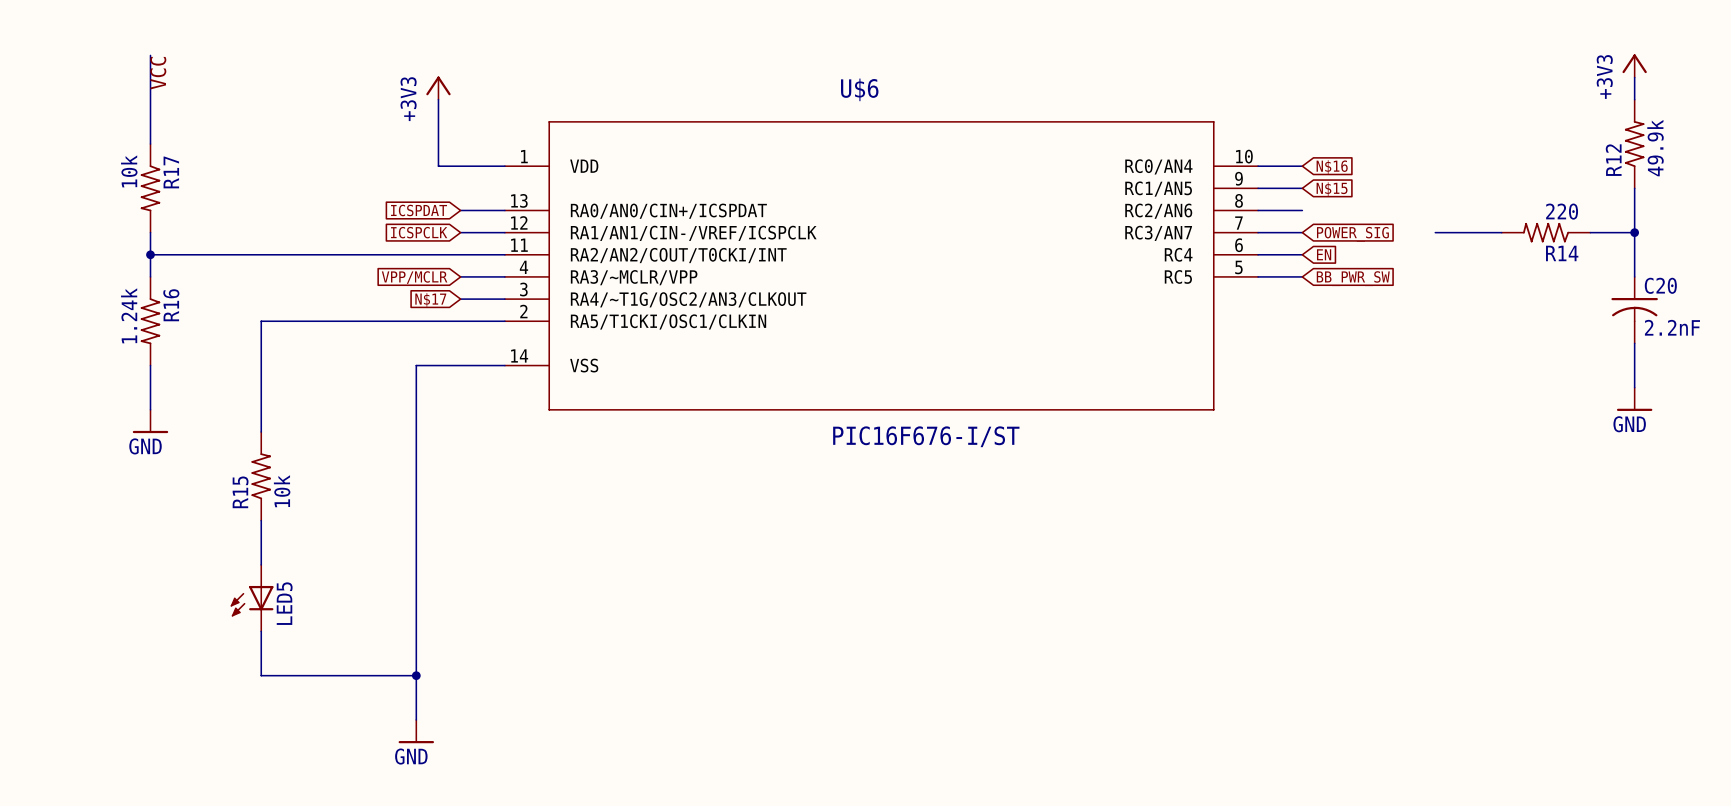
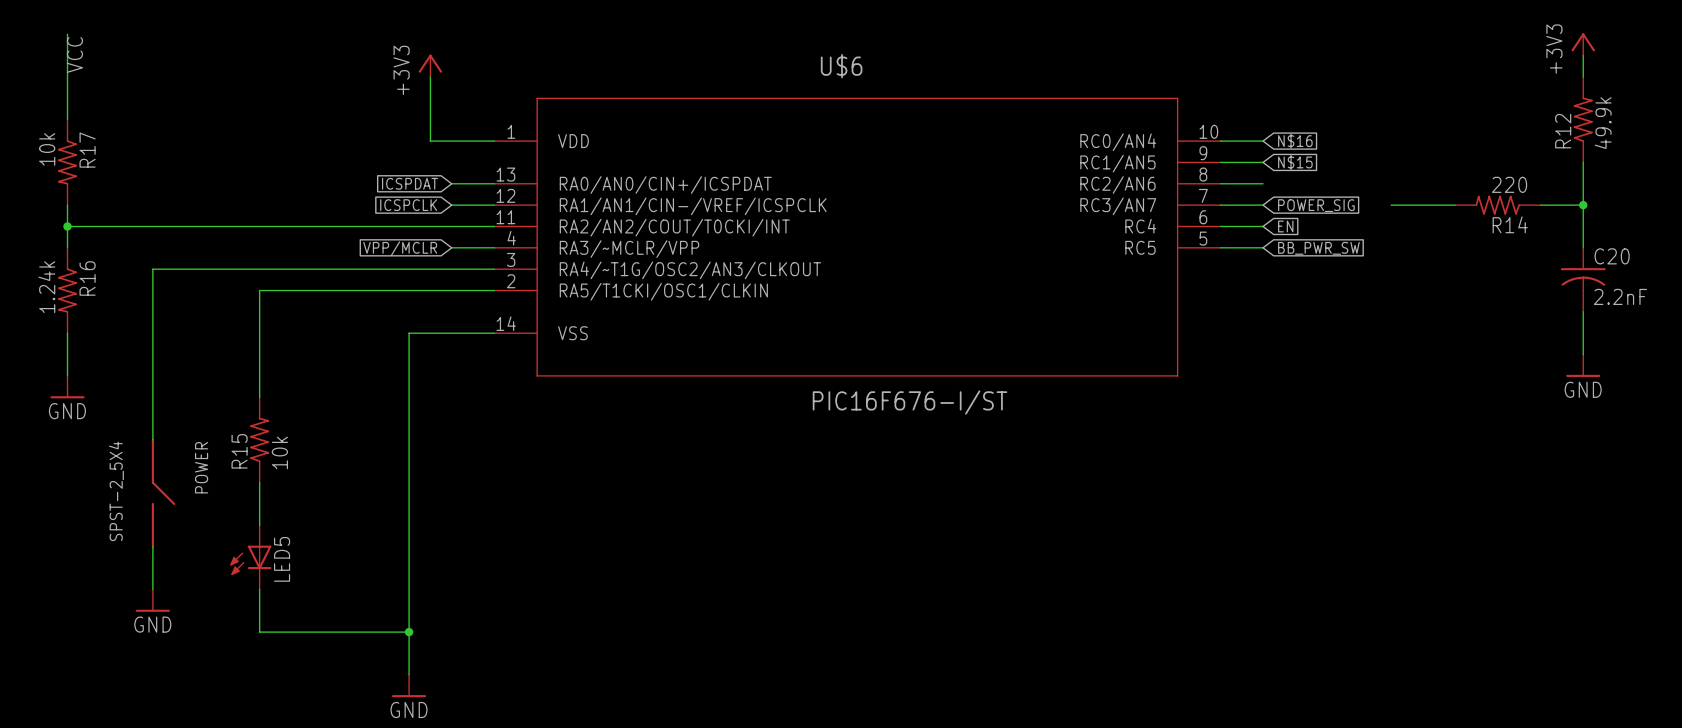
wire: (150, 55) (150, 144) -> (67, 34) (67, 119)
label position: VCC (158, 73) -> VCC (74, 54)
R17 position: (150, 188) -> (67, 162)
wire: (150, 232) (150, 276) -> (67, 205) (67, 247)
wire: none -> (67, 226) (152, 226)
junction: none -> (67, 226)
junction: (150, 254) -> none
global label: N$17 (430, 299) -> none
wire: none -> (451, 269) (152, 269) (152, 333)
R16 position: (150, 321) -> (67, 290)
wire: none -> (67, 333) (67, 375)
wire: none -> (152, 375) (152, 439)
power symbol position: GND (150, 421) -> GND (67, 387)
POWER: none -> SPST-2_5X4 (163, 493)
wire: none -> (152, 546) (152, 589)
power symbol: none -> GND (152, 600)

